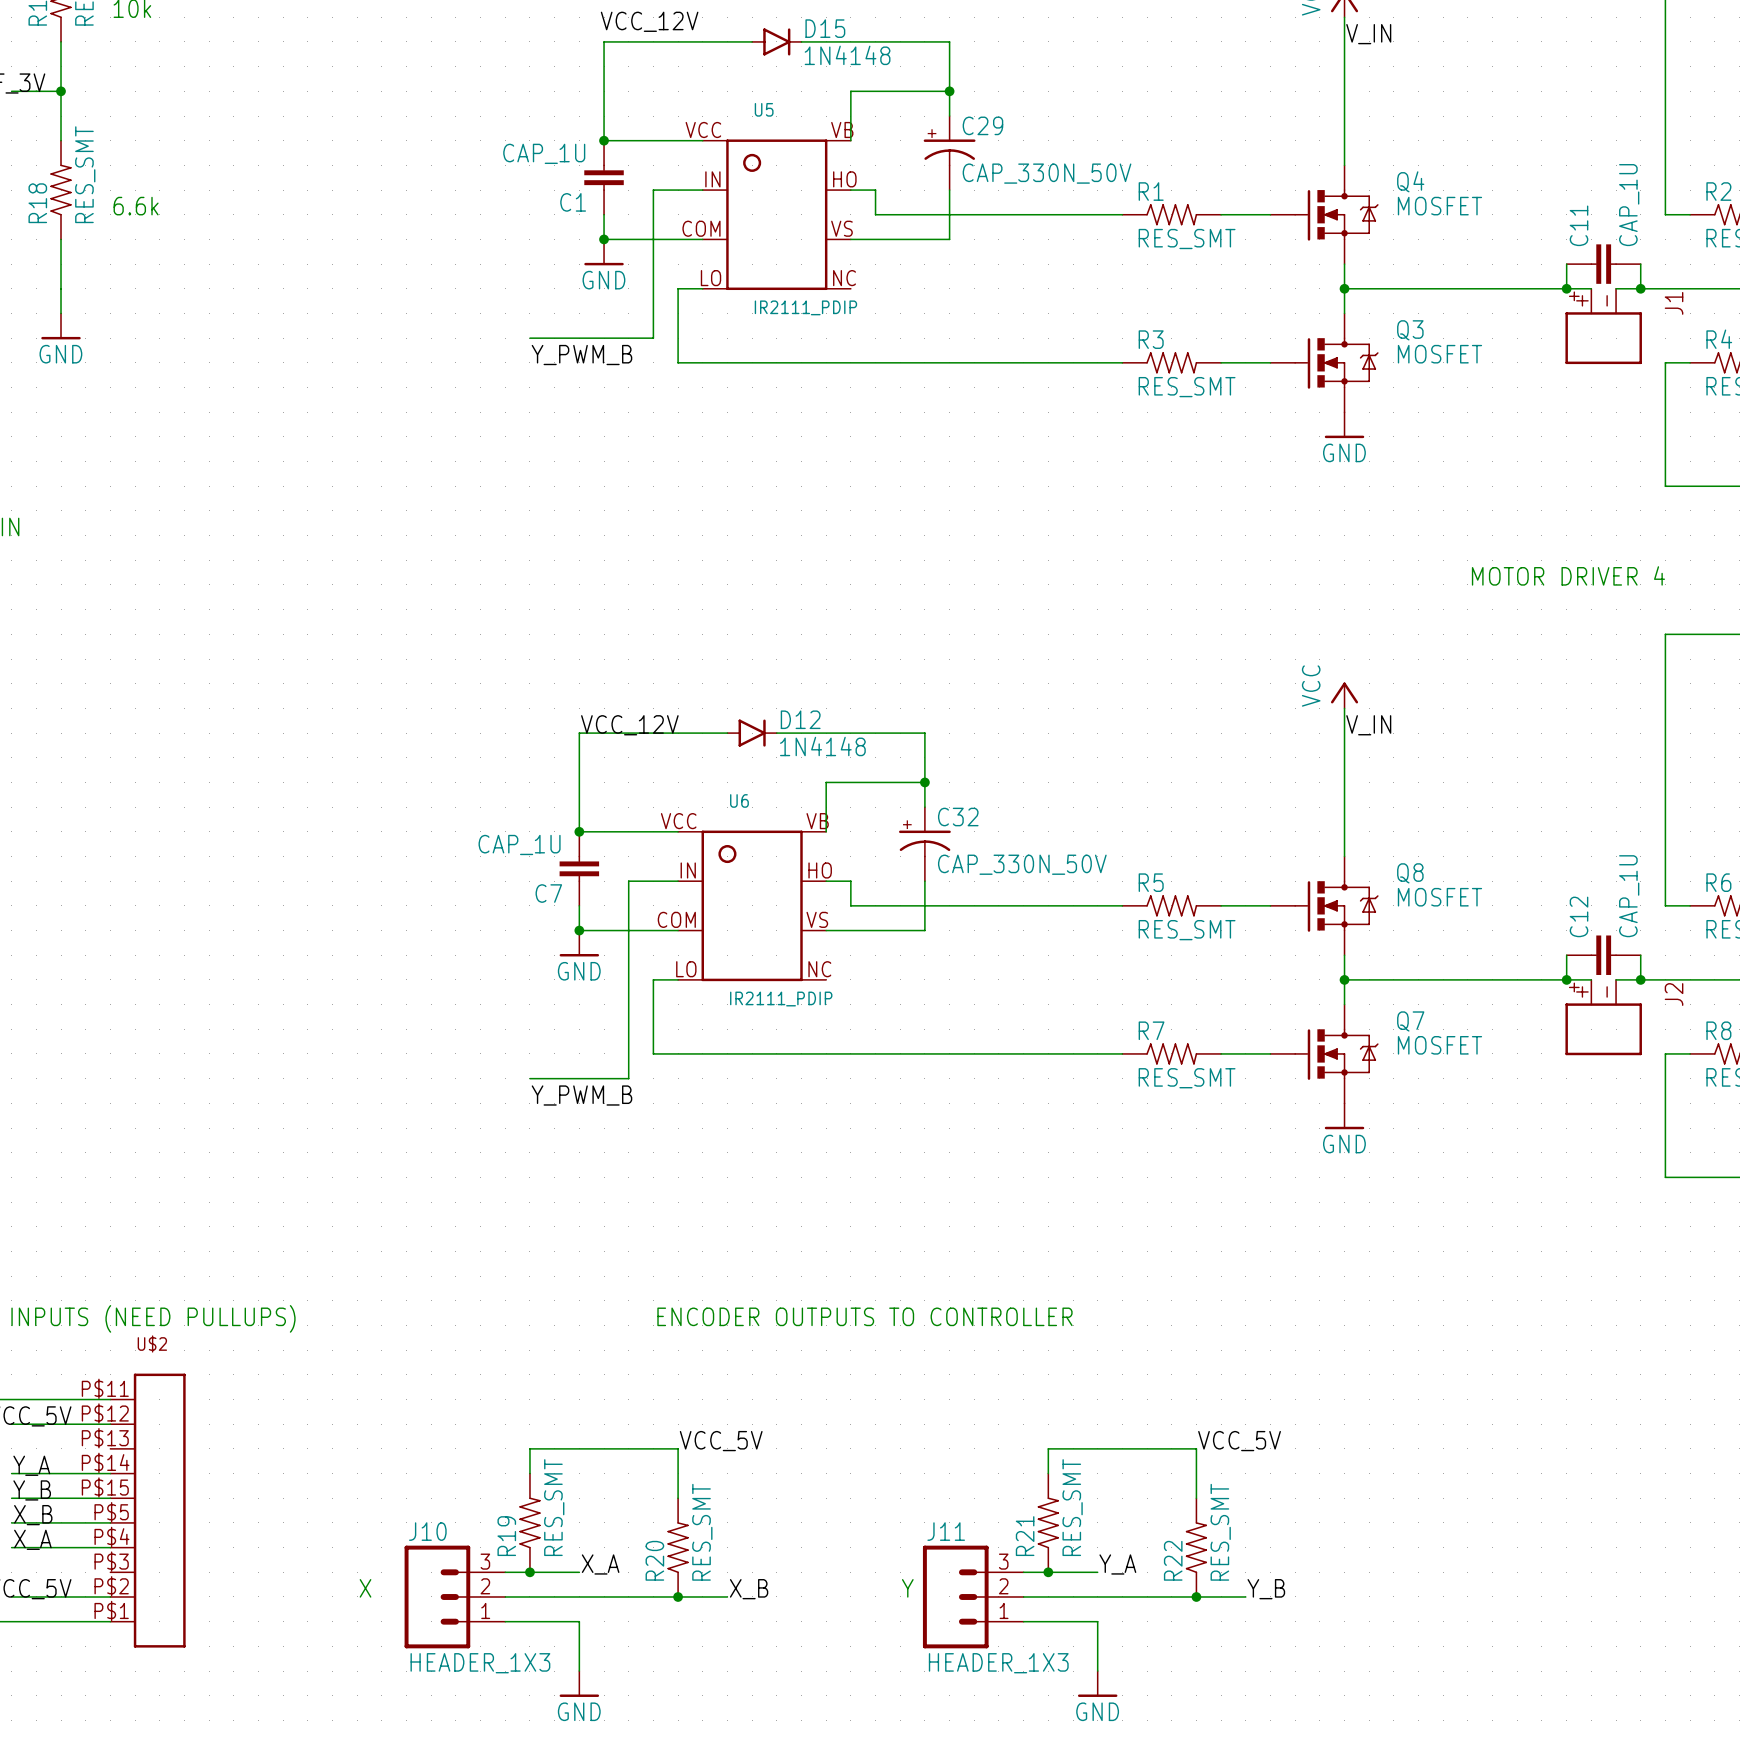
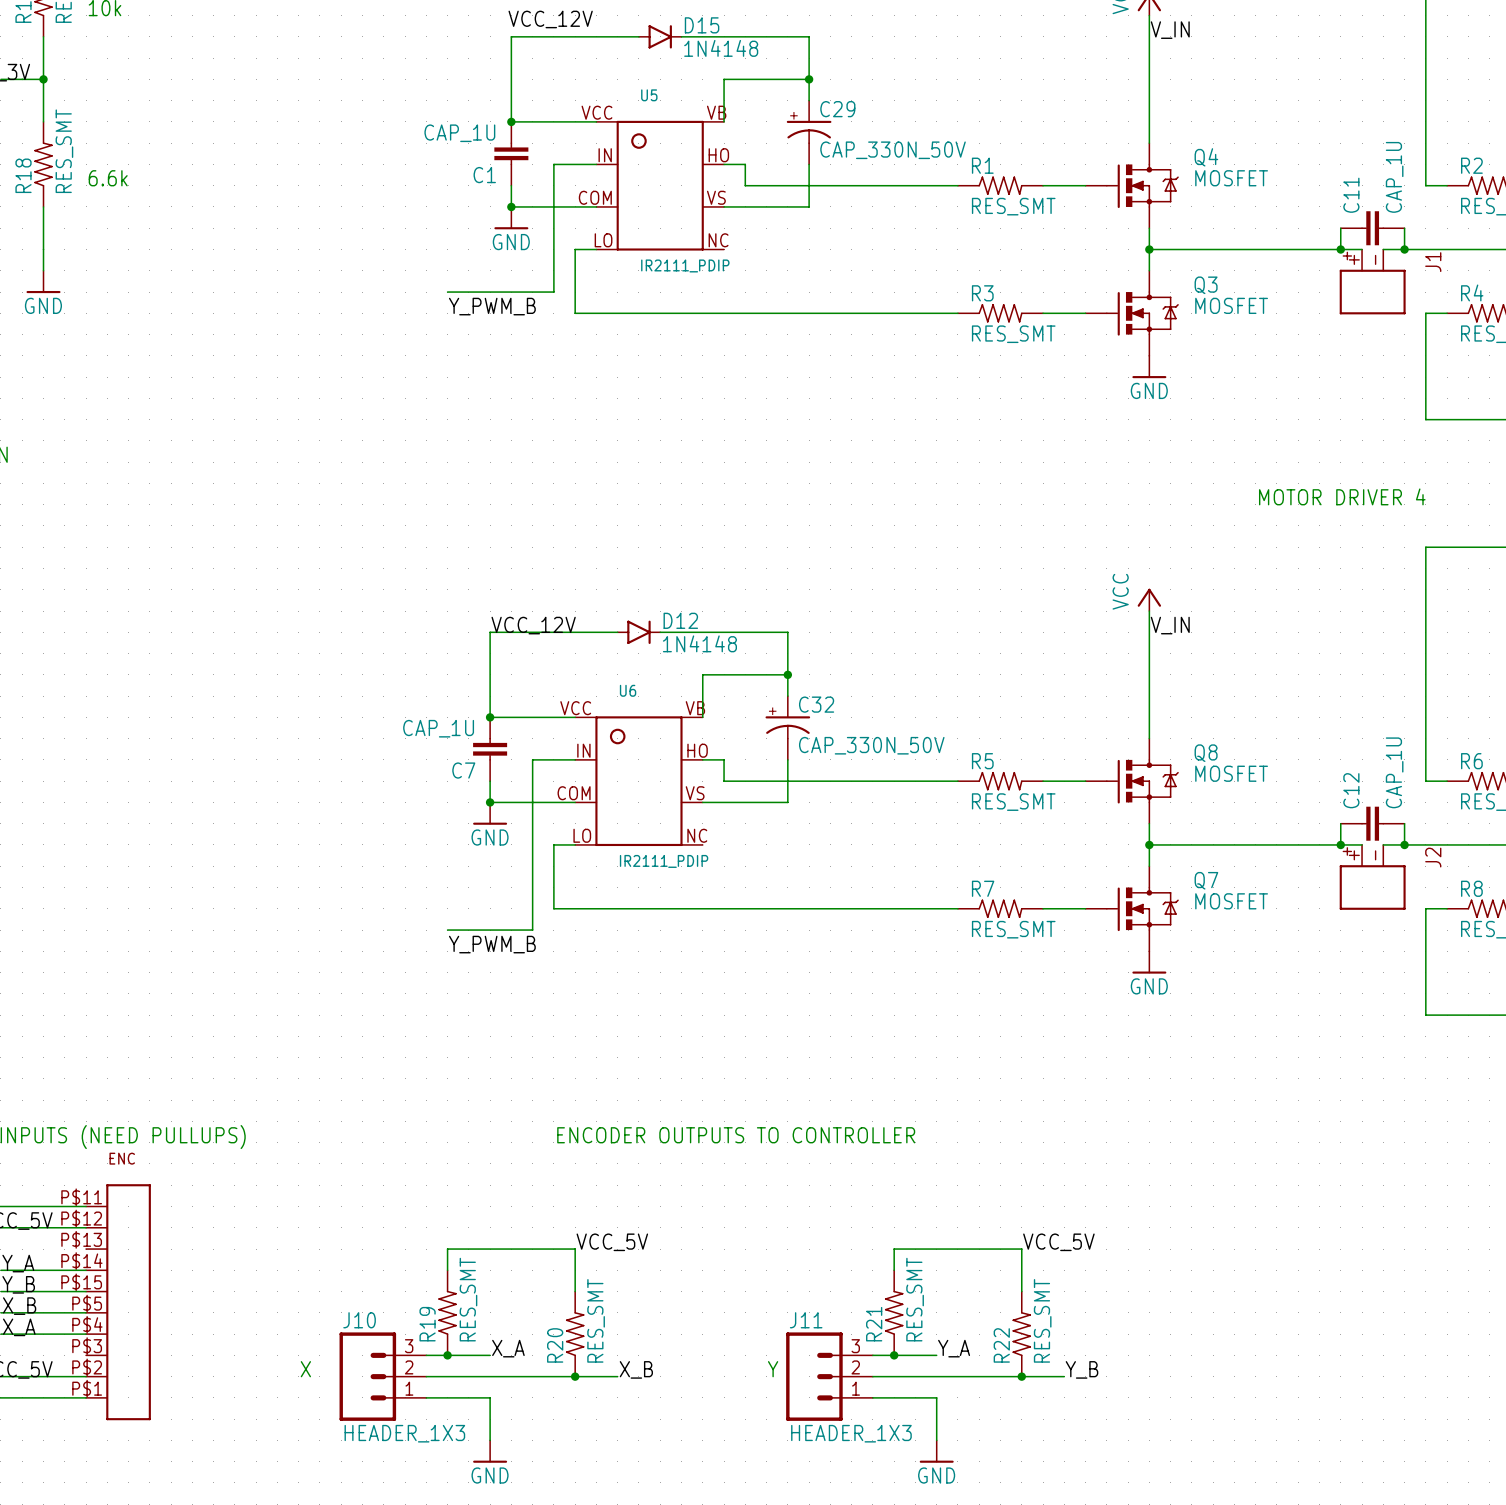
U$2 name: U$2 (152, 1343) -> ENC (122, 1158)

